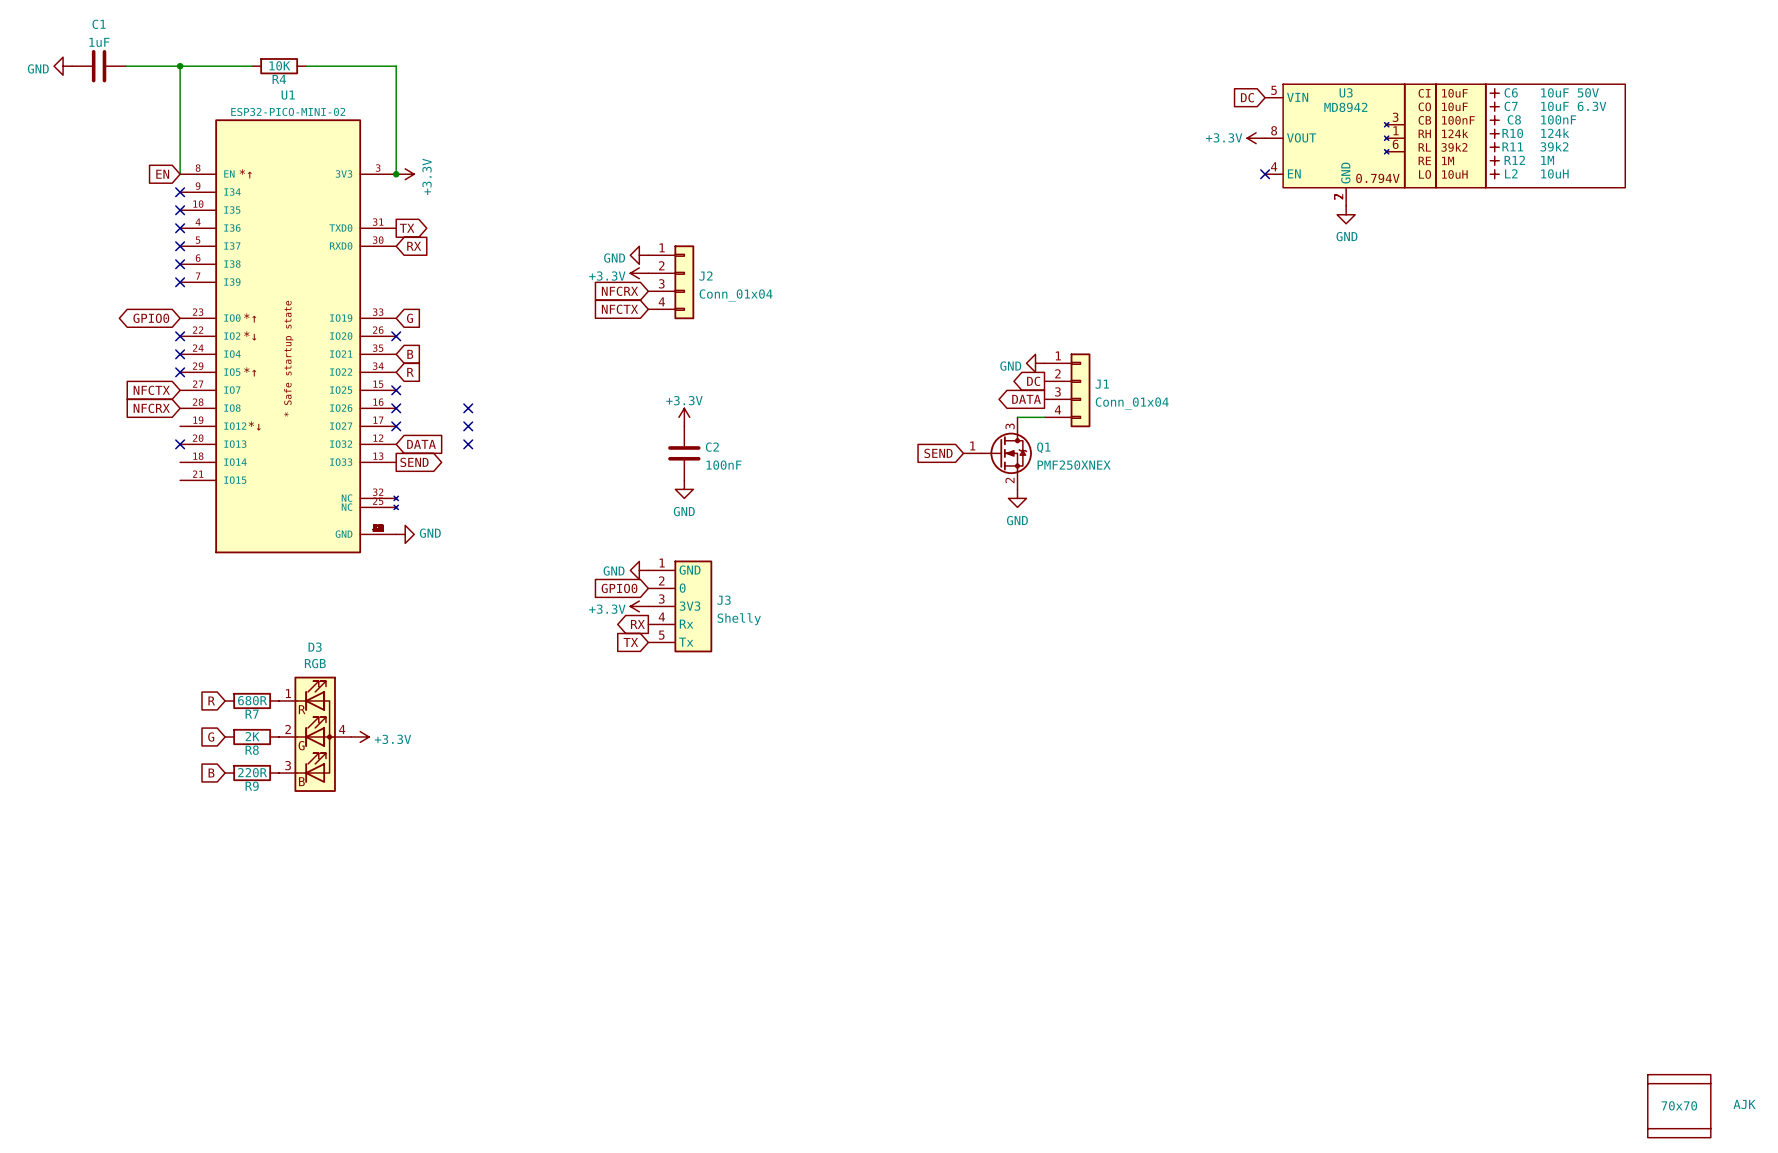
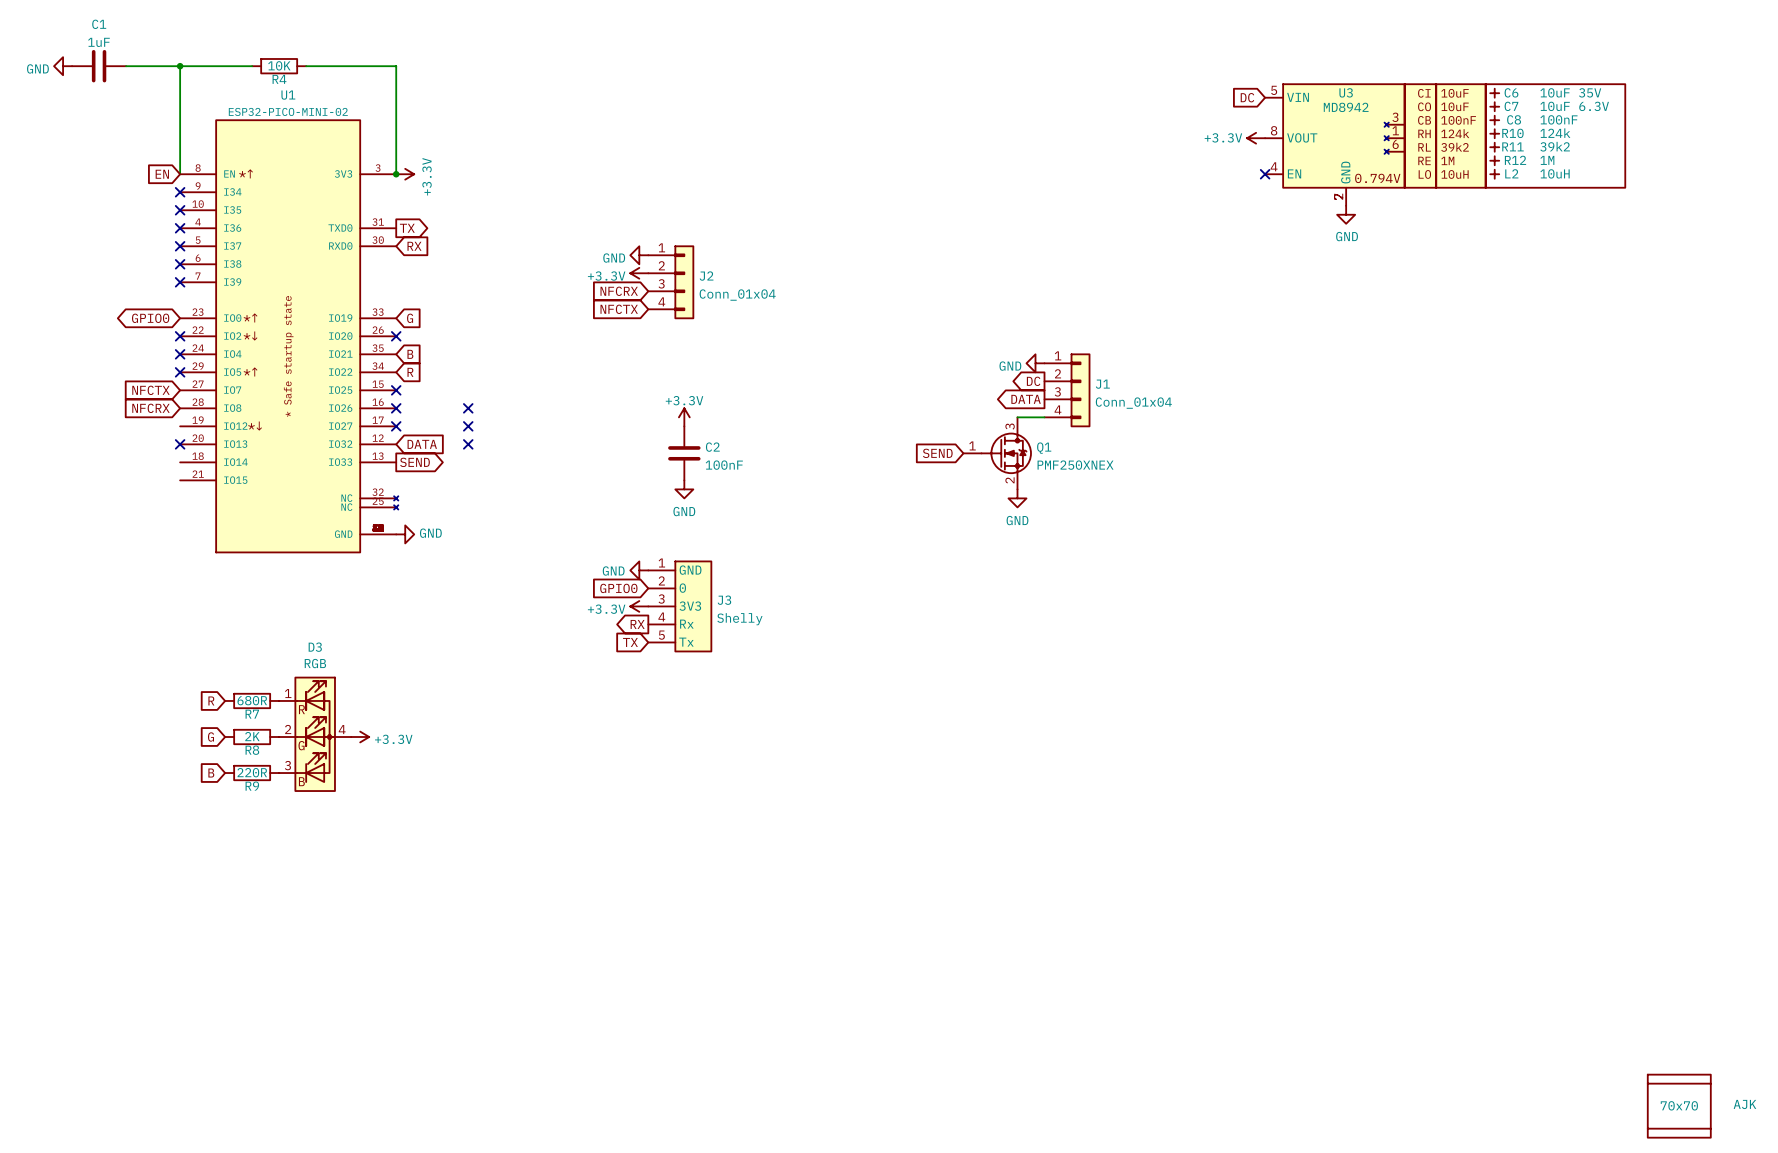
C6 value: 10uF 50V (1570, 92) -> 10uF 35V (1570, 92)

